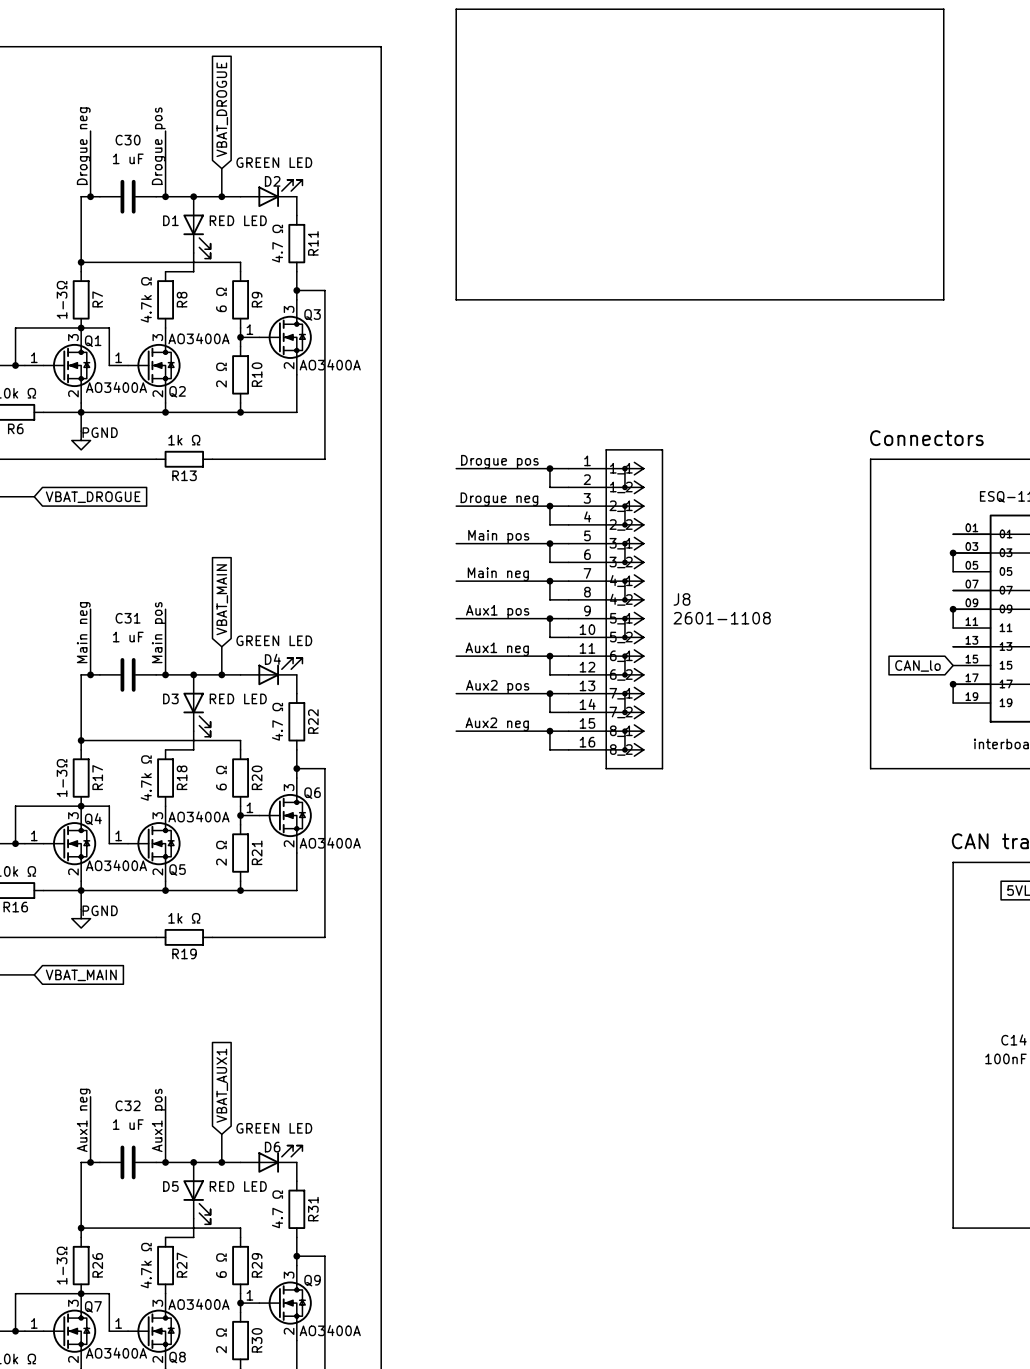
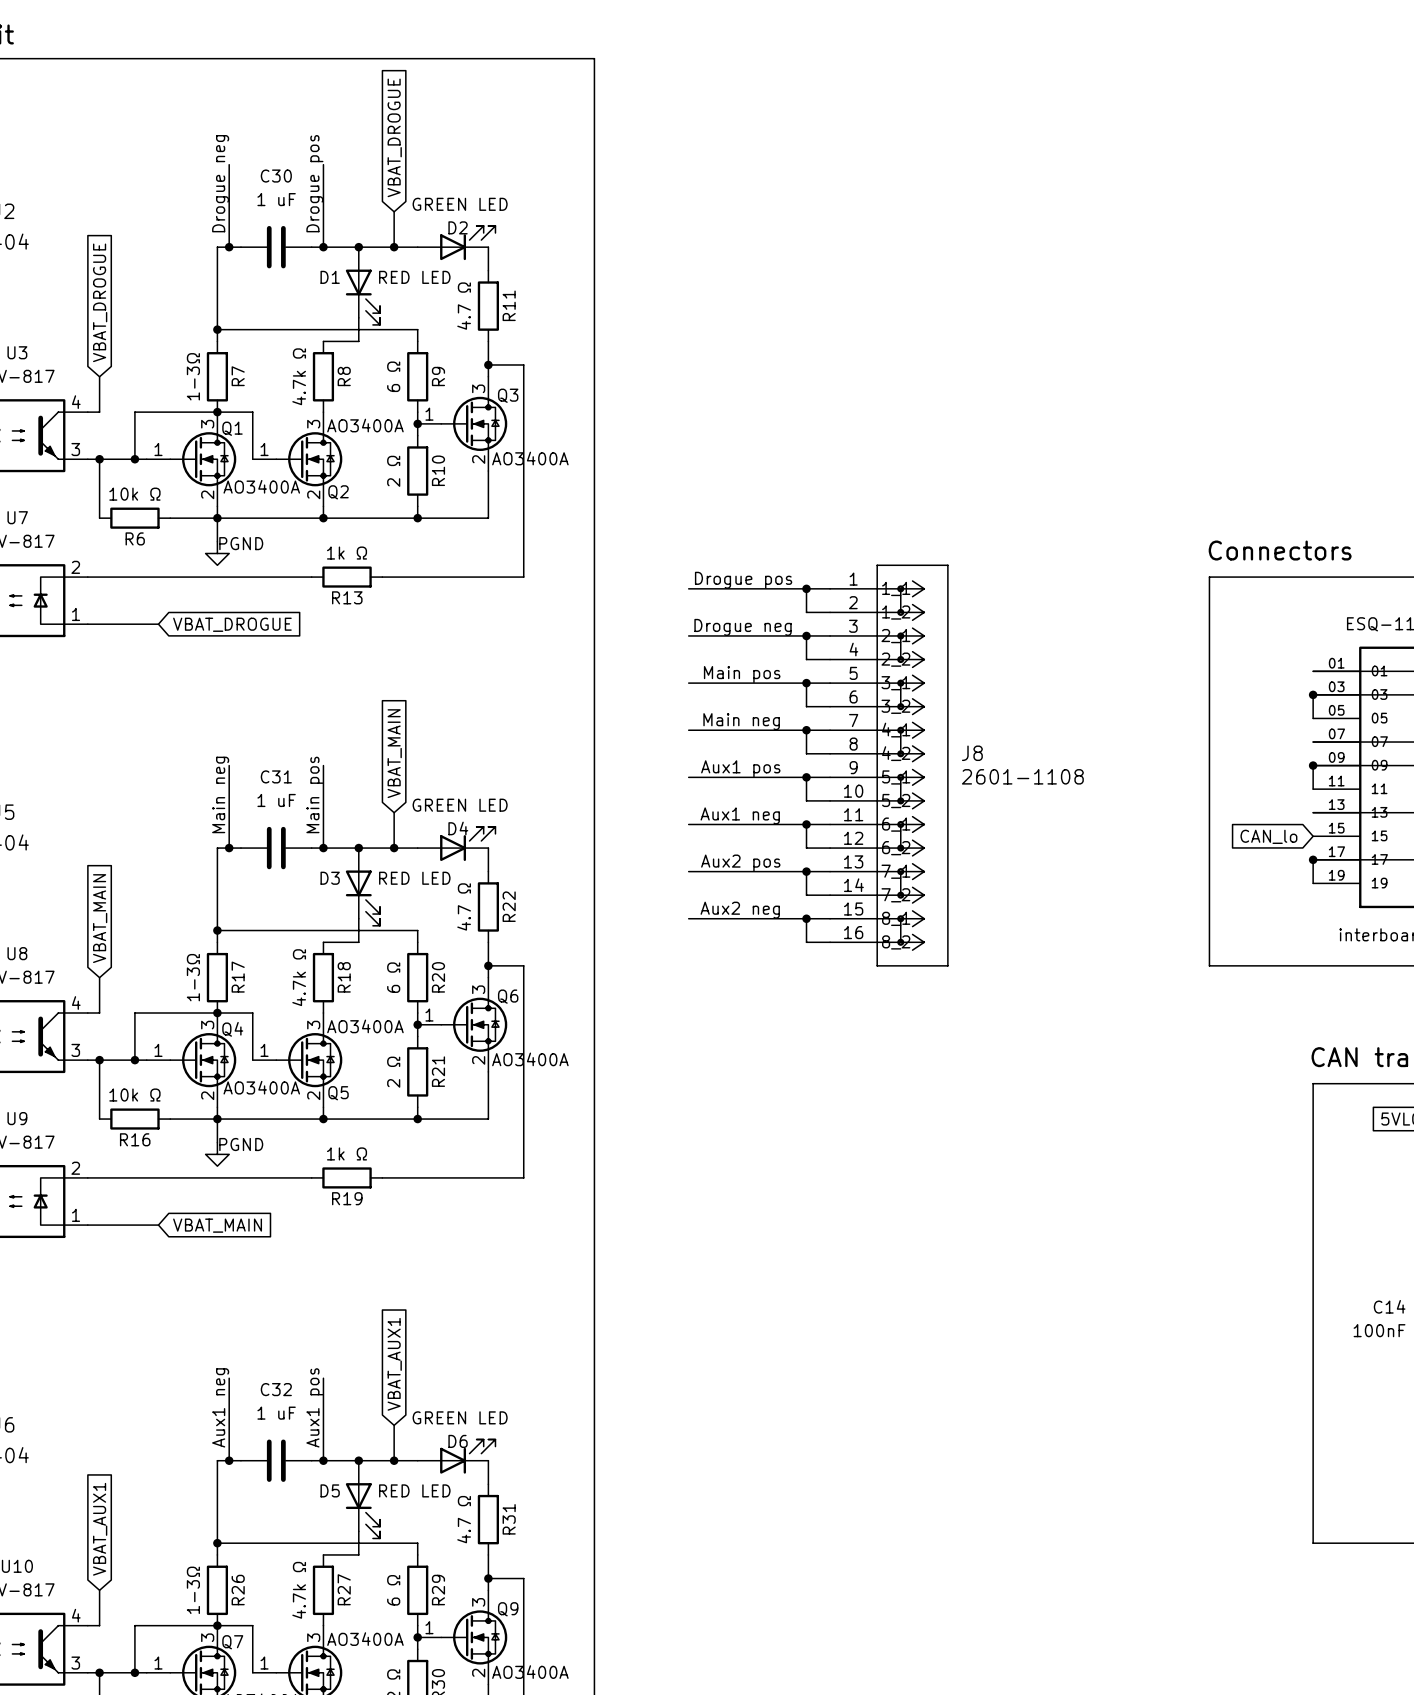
line: (456, 9) (943, 9) (943, 299) (456, 299) (456, 9) -> none

